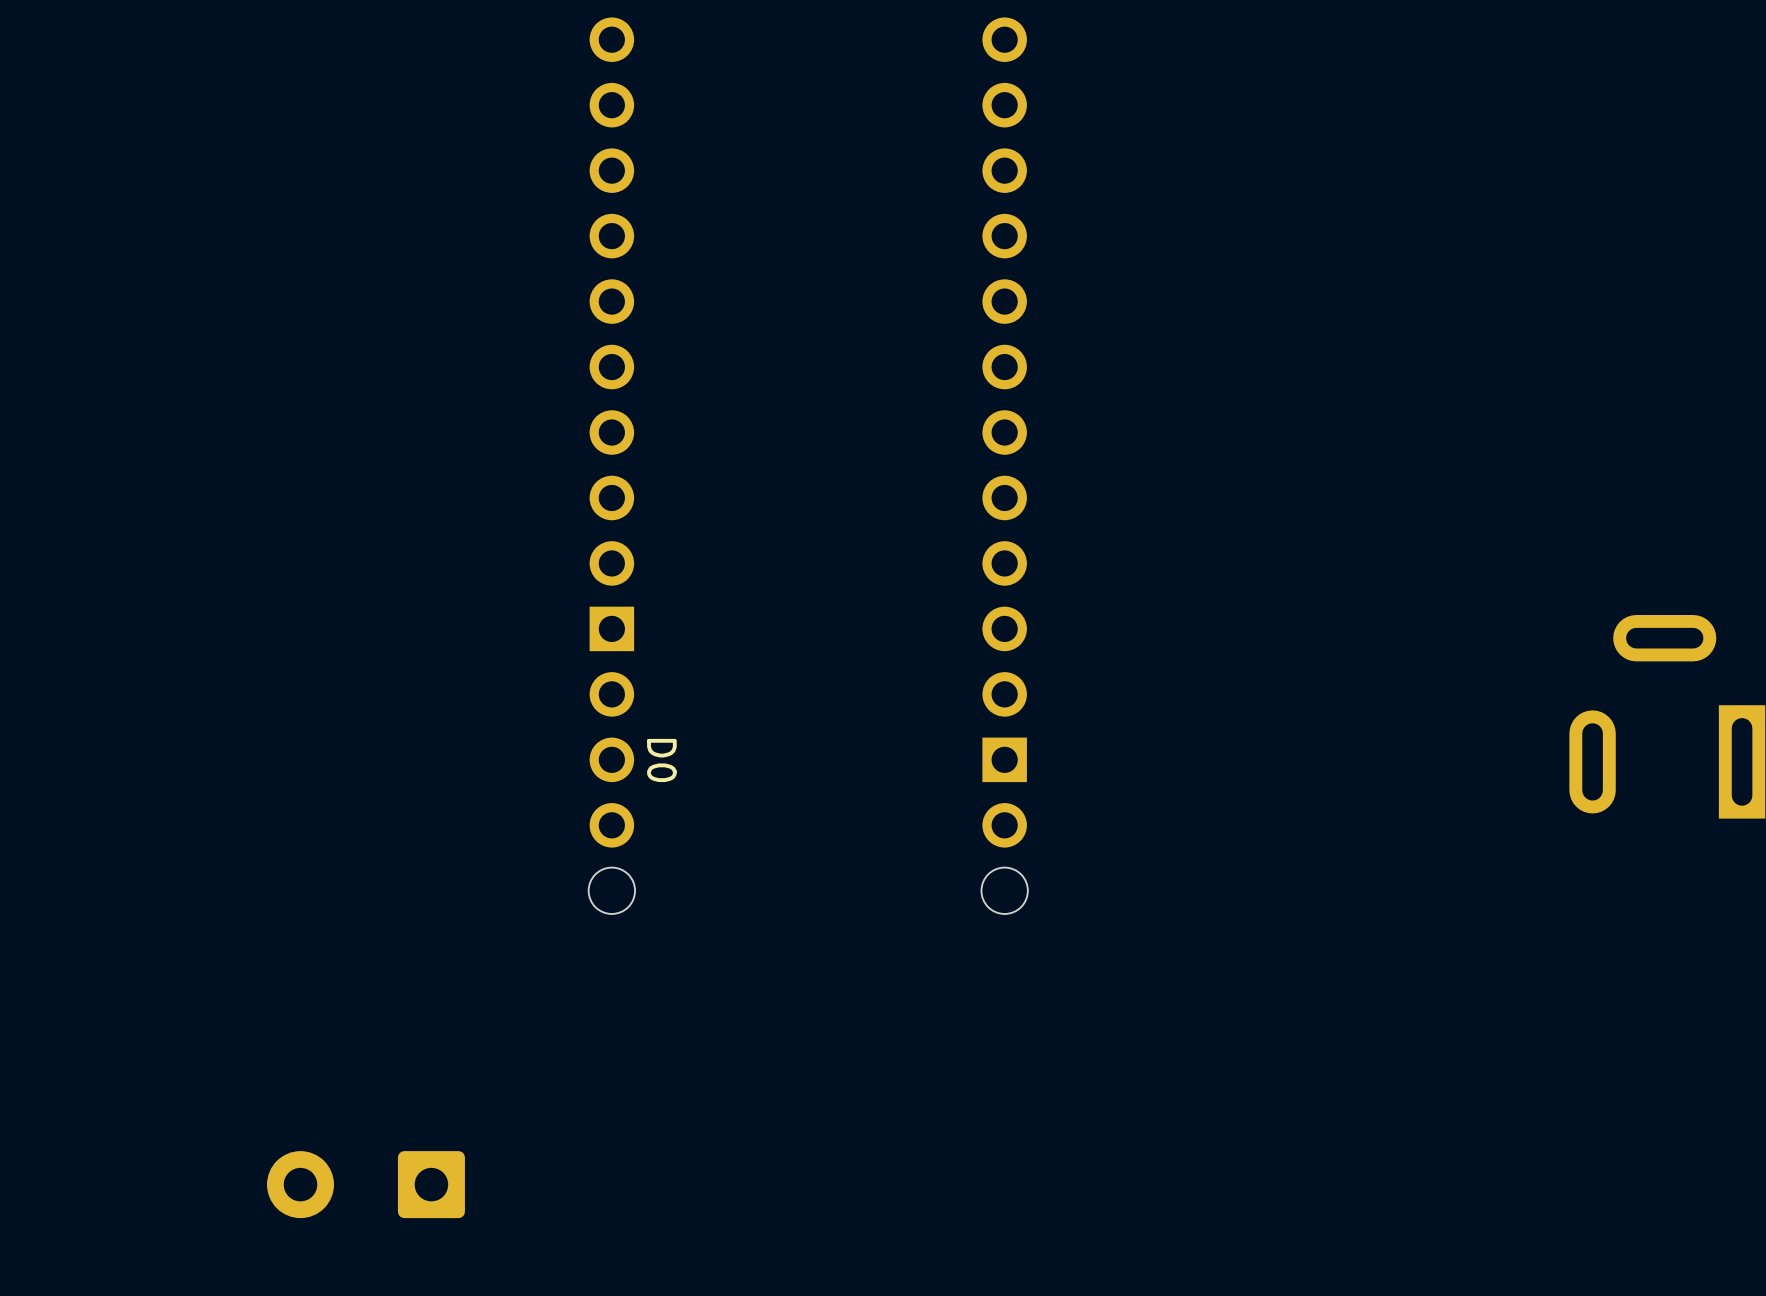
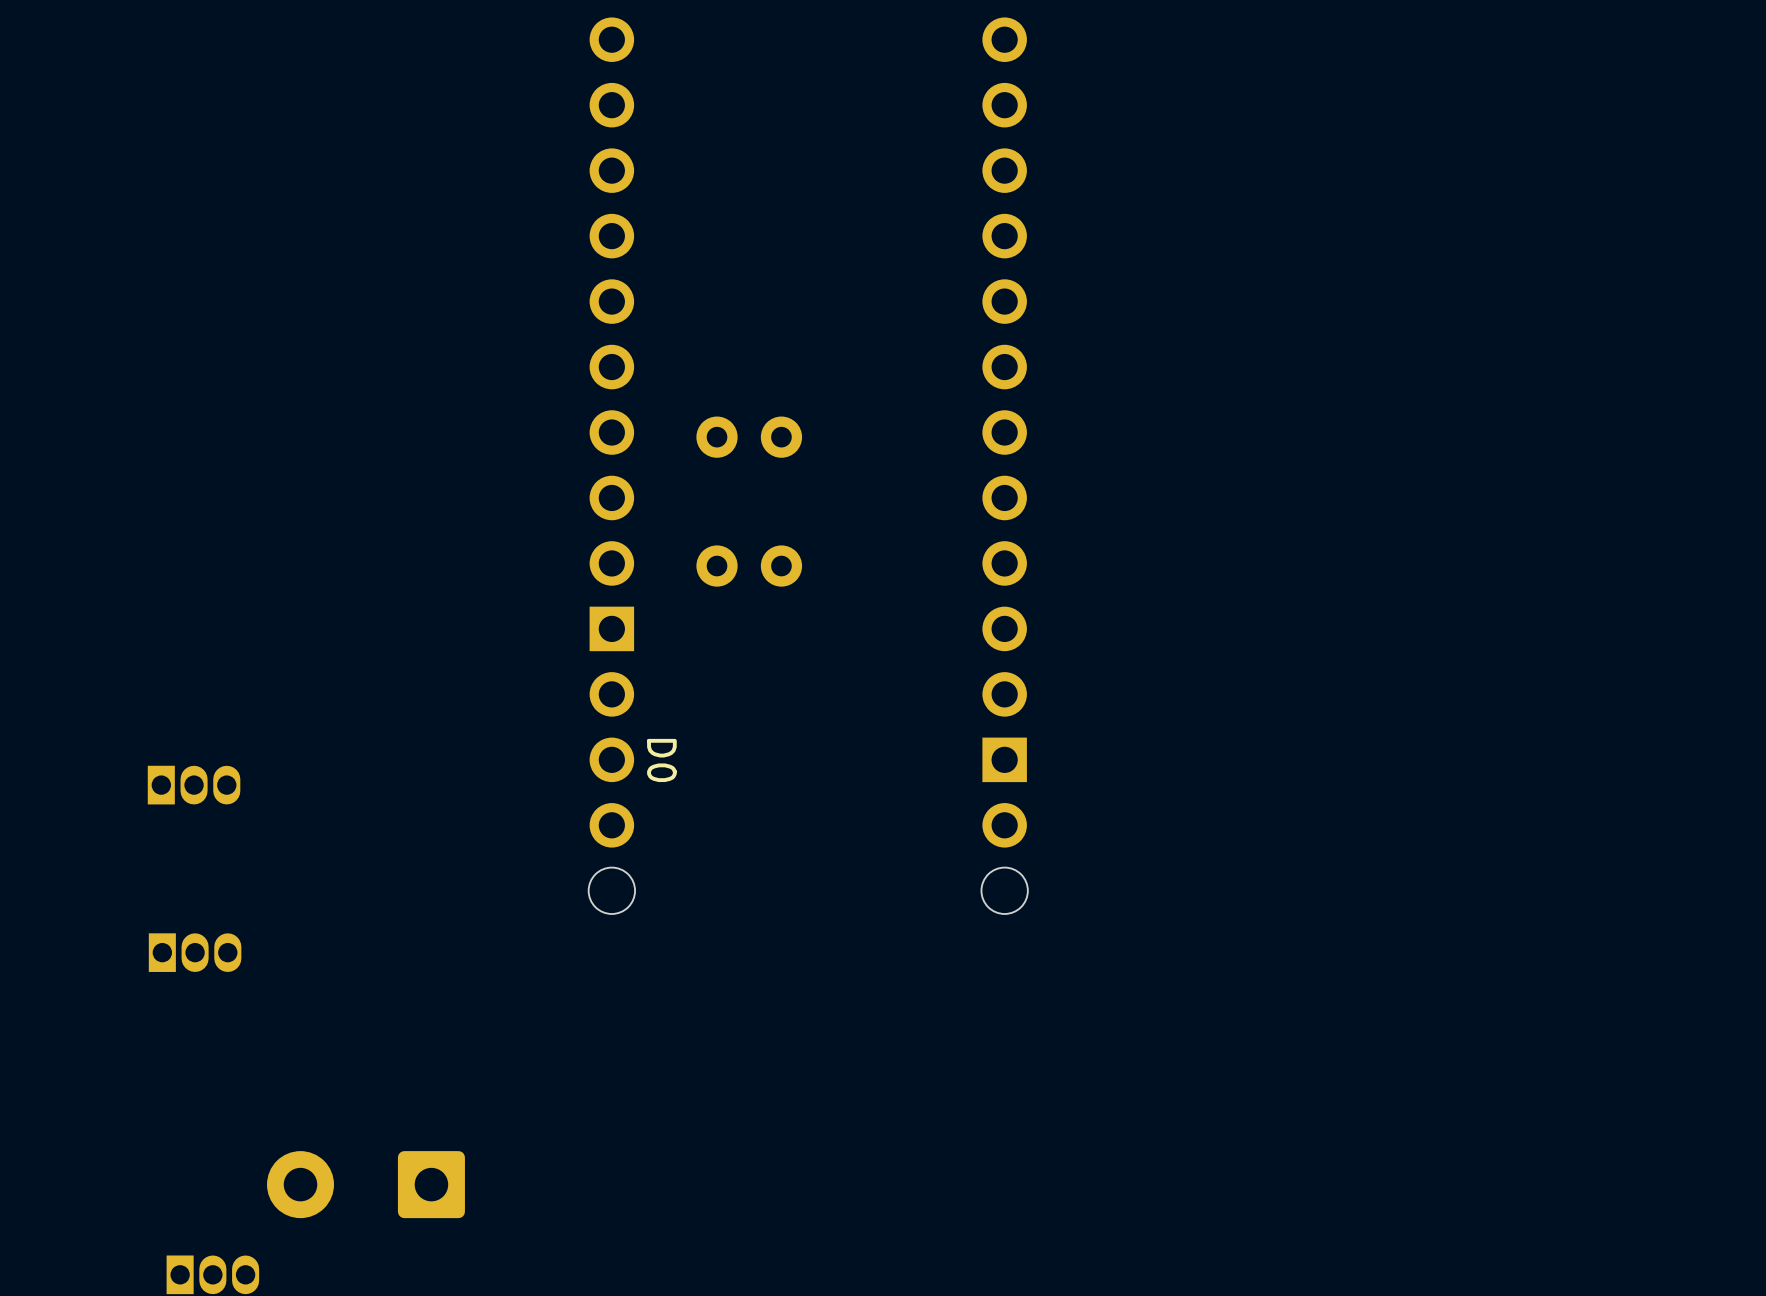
part: none -> (749, 437)
part: none -> (749, 566)
part: (1667, 716) -> none
part: none -> (194, 785)
part: none -> (195, 952)
part: none -> (212, 1274)

